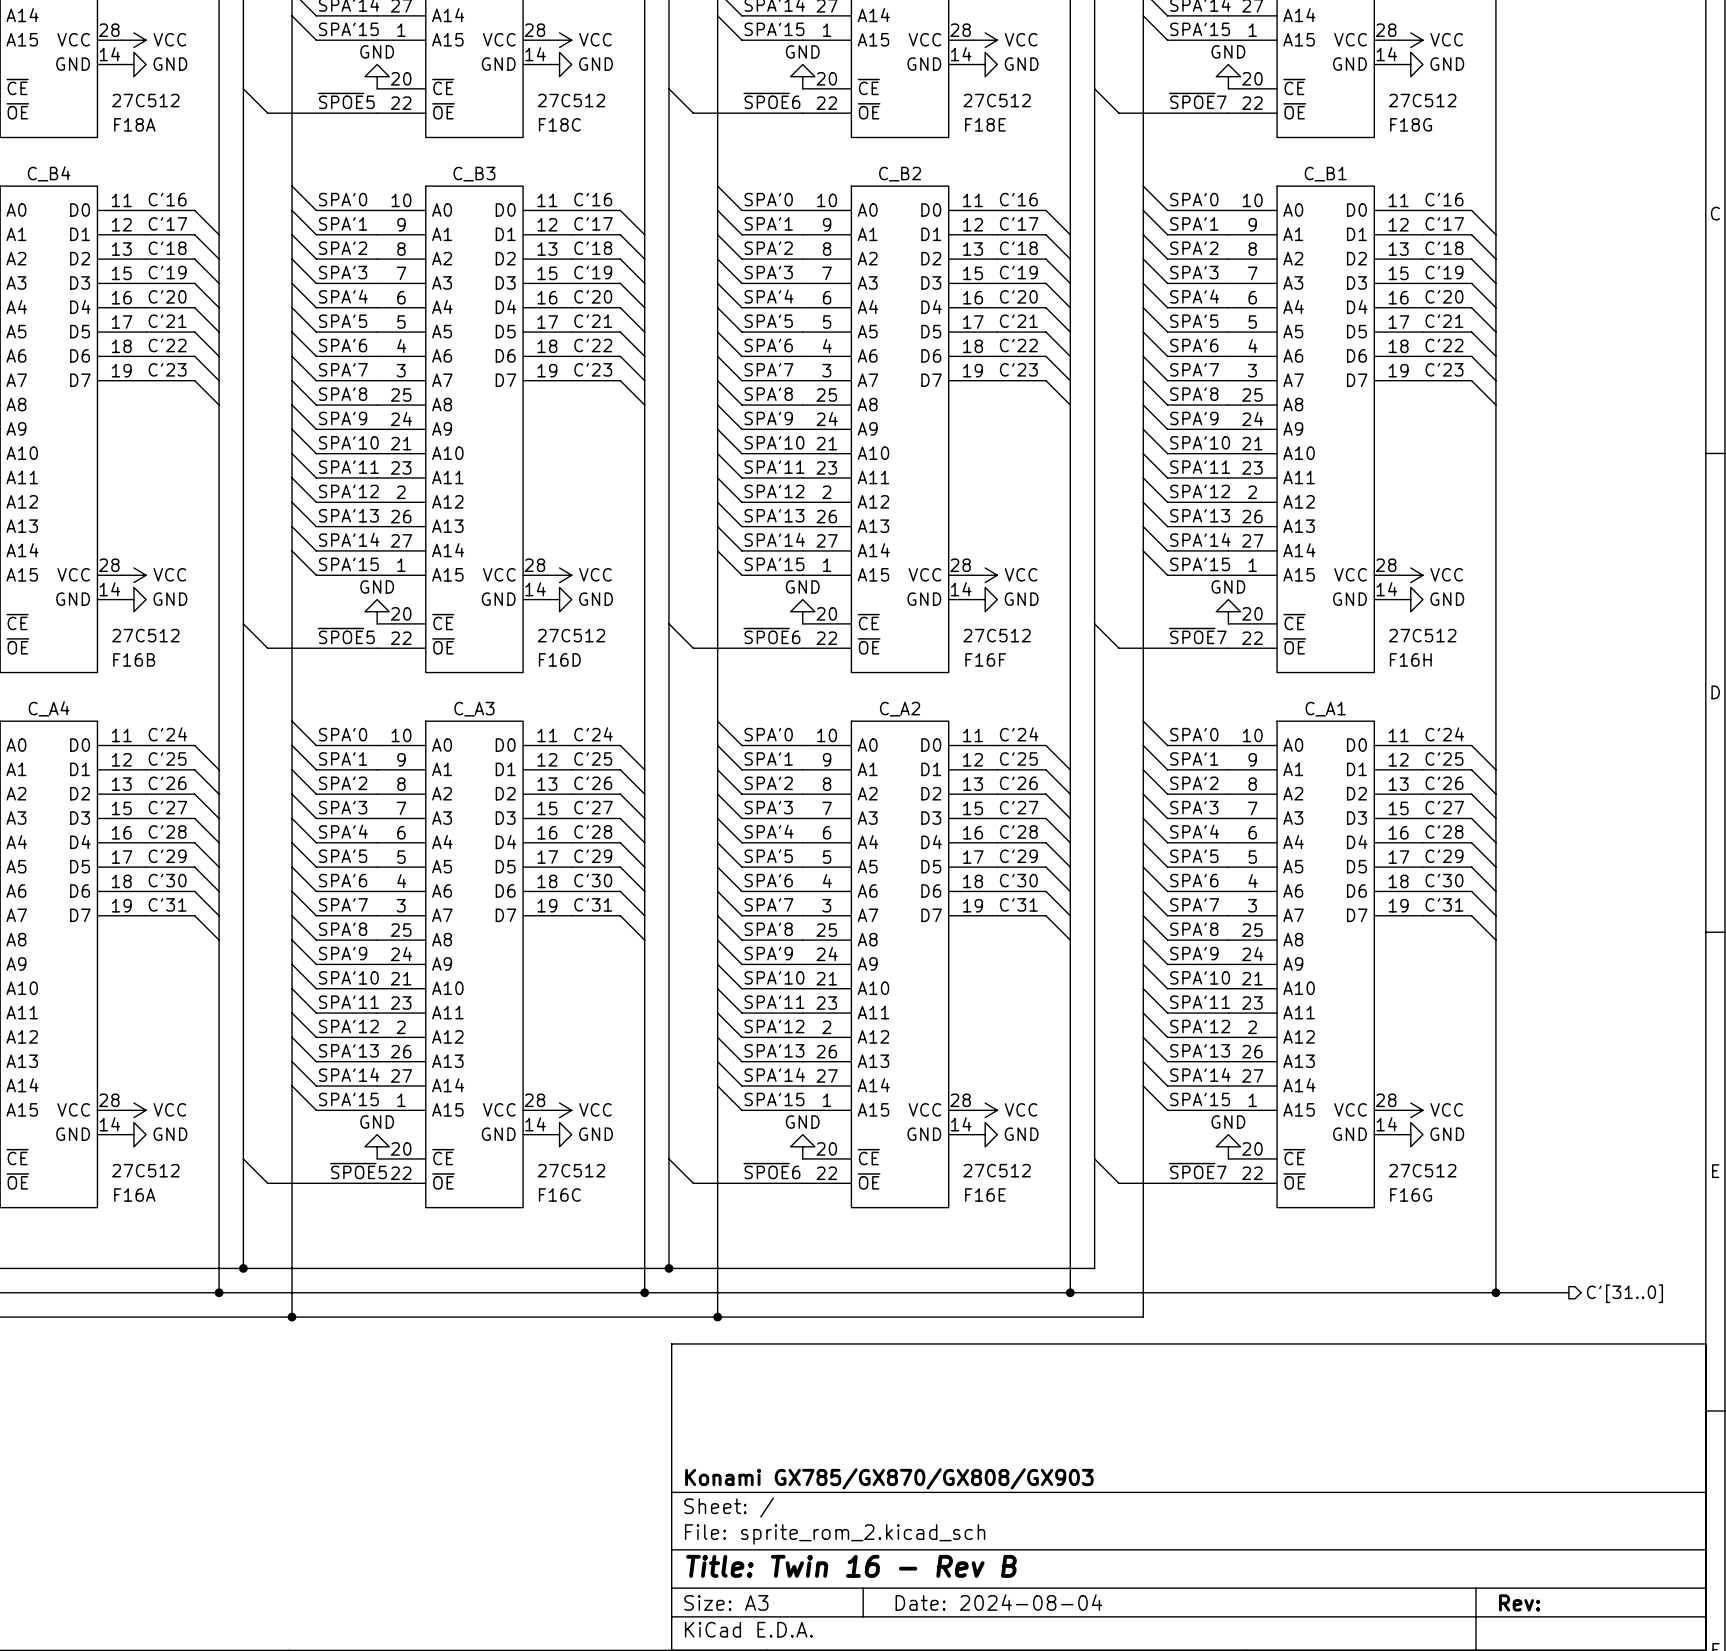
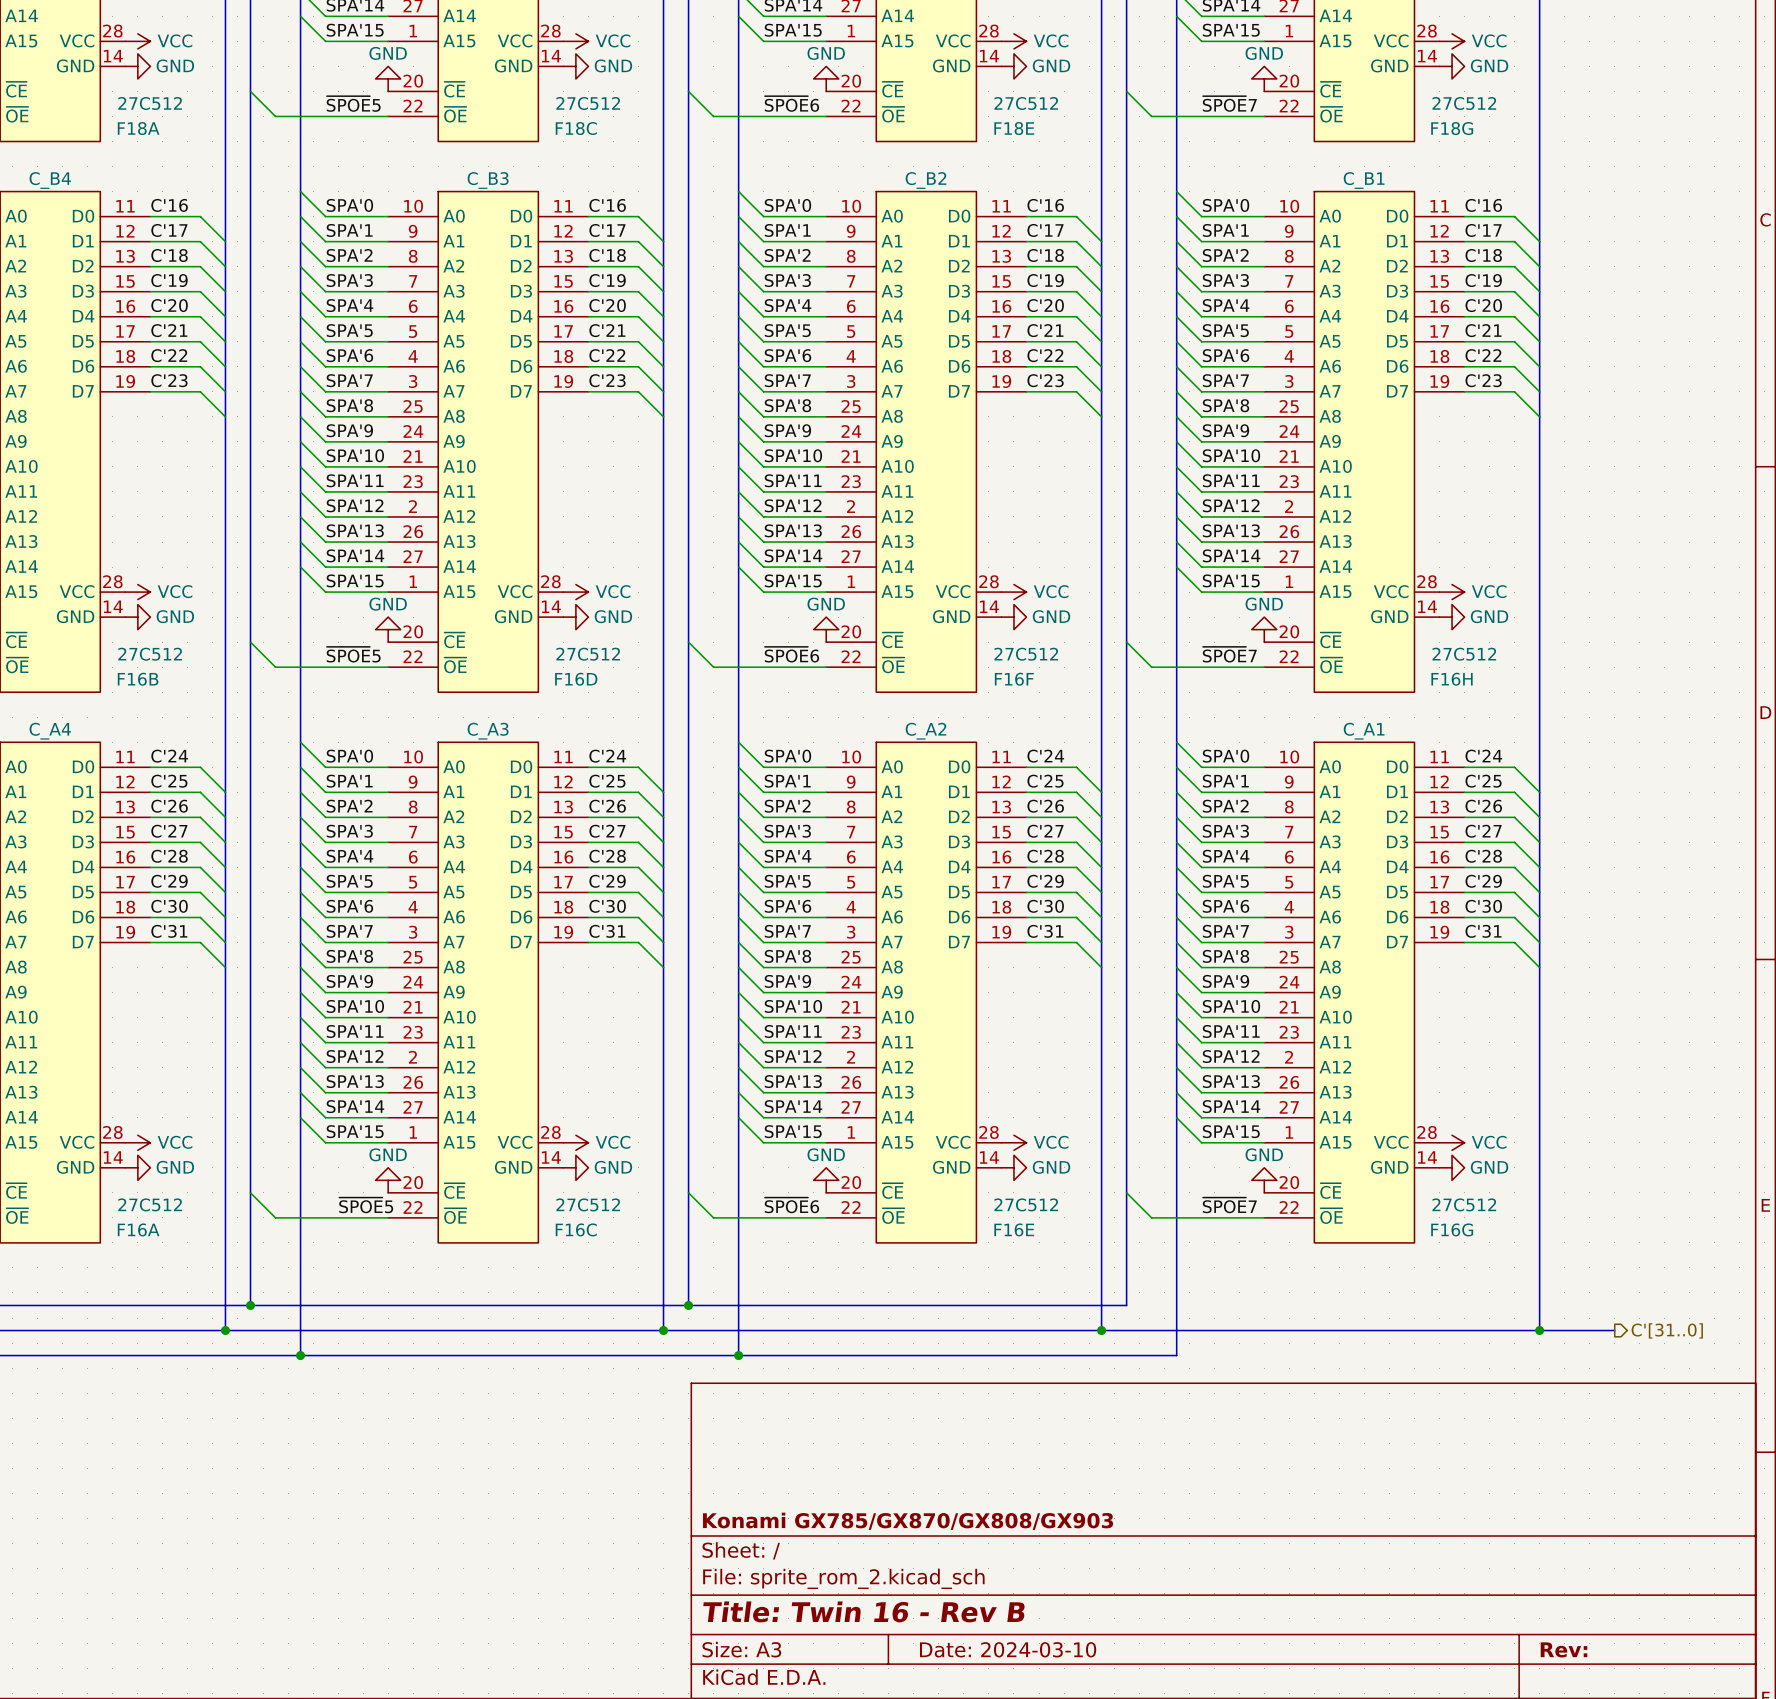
title block: Date: 2024-08-04 (998, 1602) -> Date: 2024-03-10 (1008, 1649)

